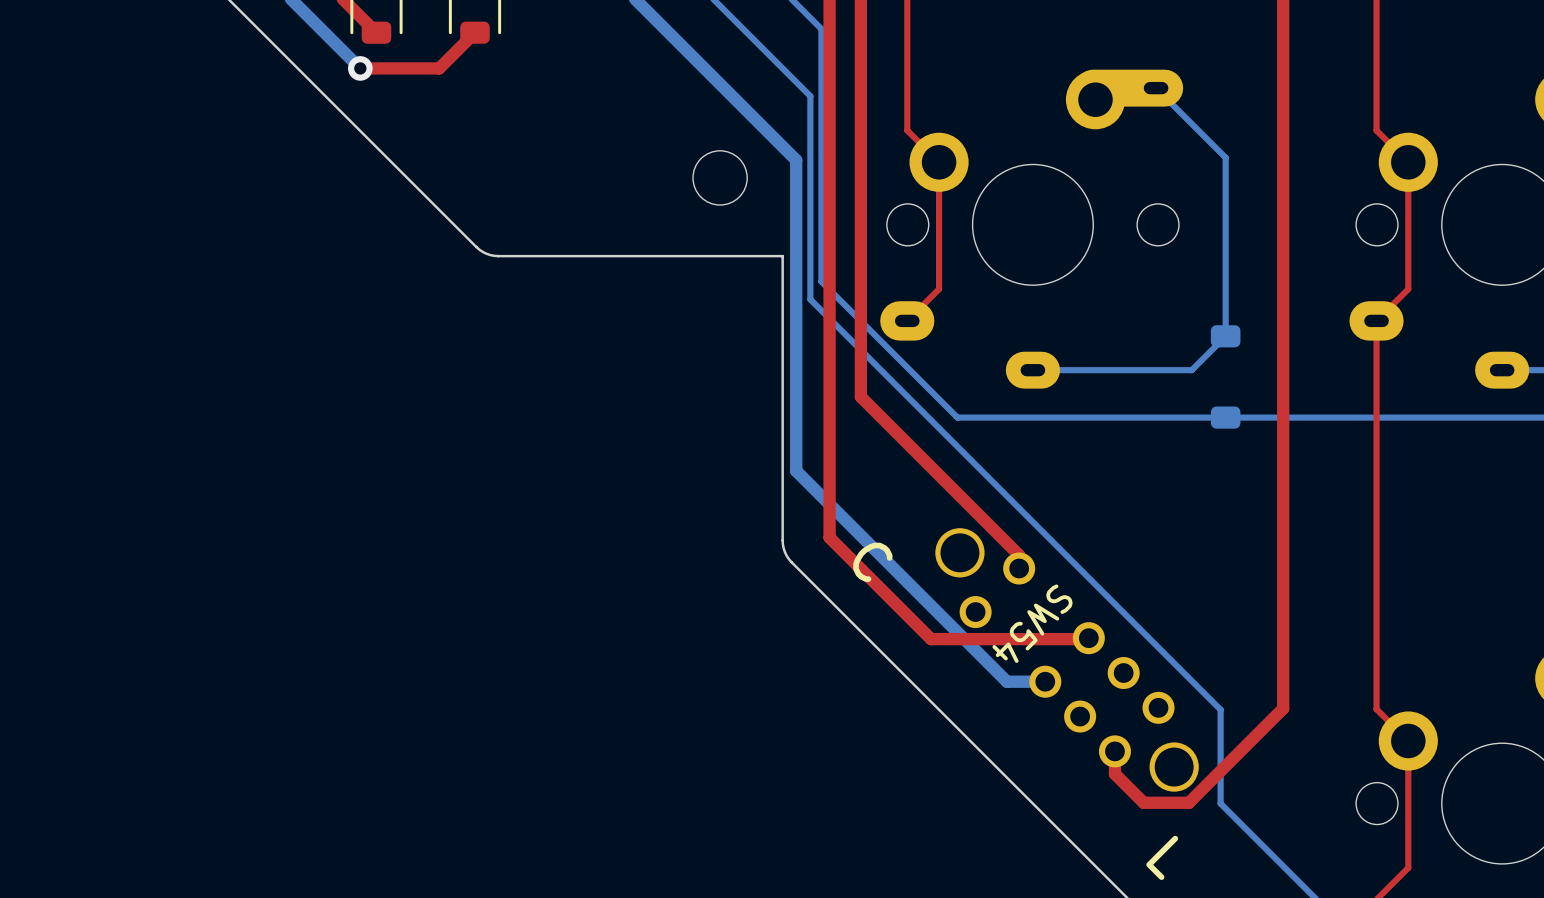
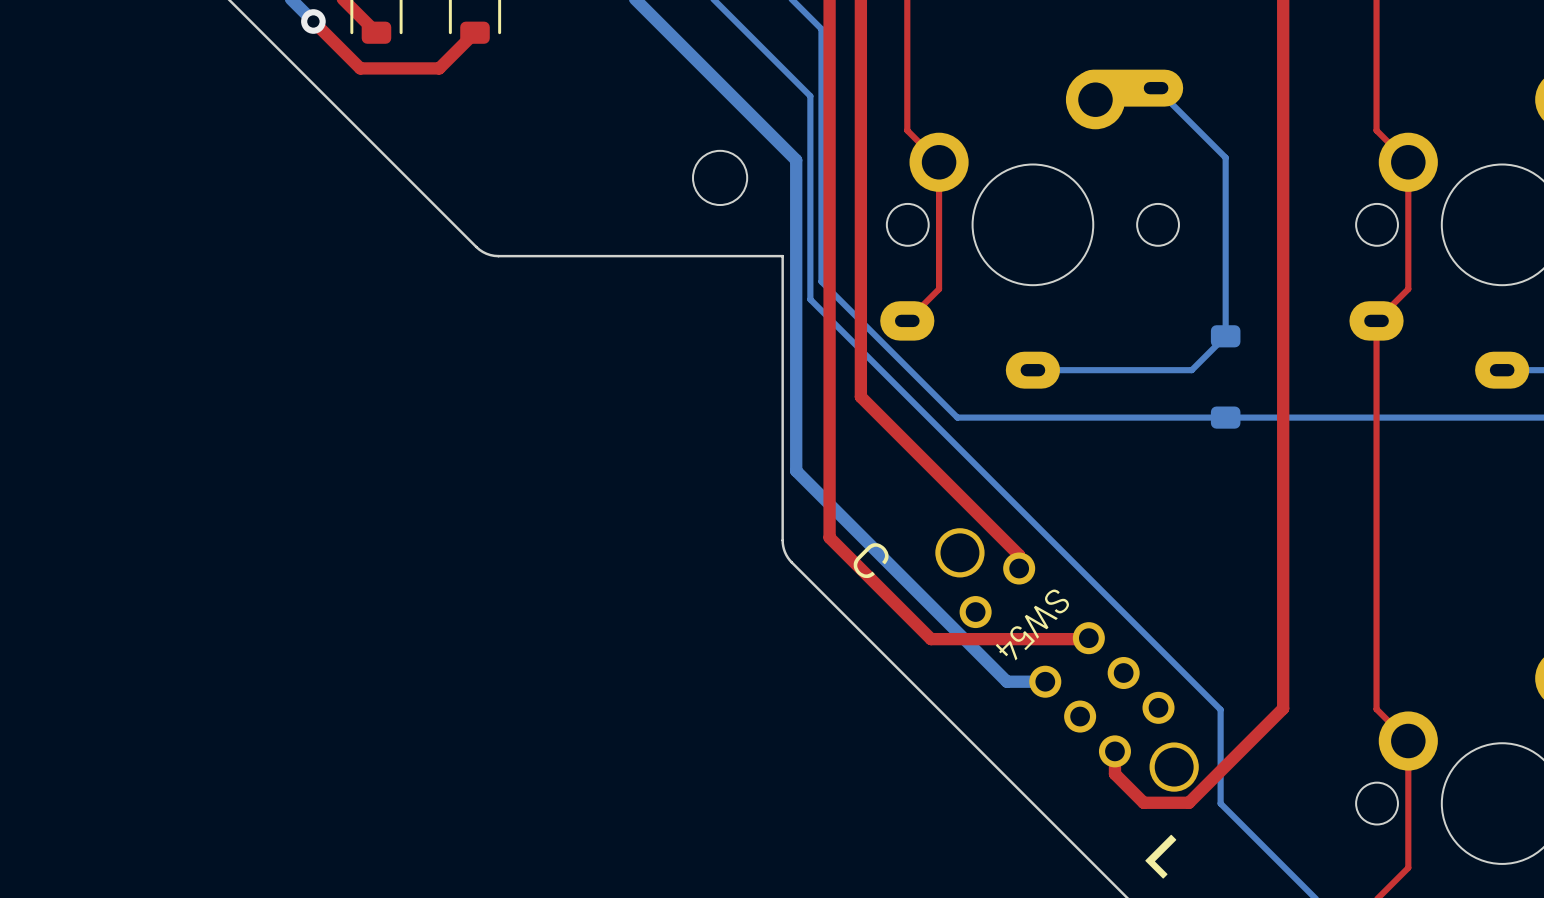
top track: none -> (313, 21) (360, 68)
bottom track: (313, 21) (360, 68) -> none
via position: (360, 68) -> (313, 21)

